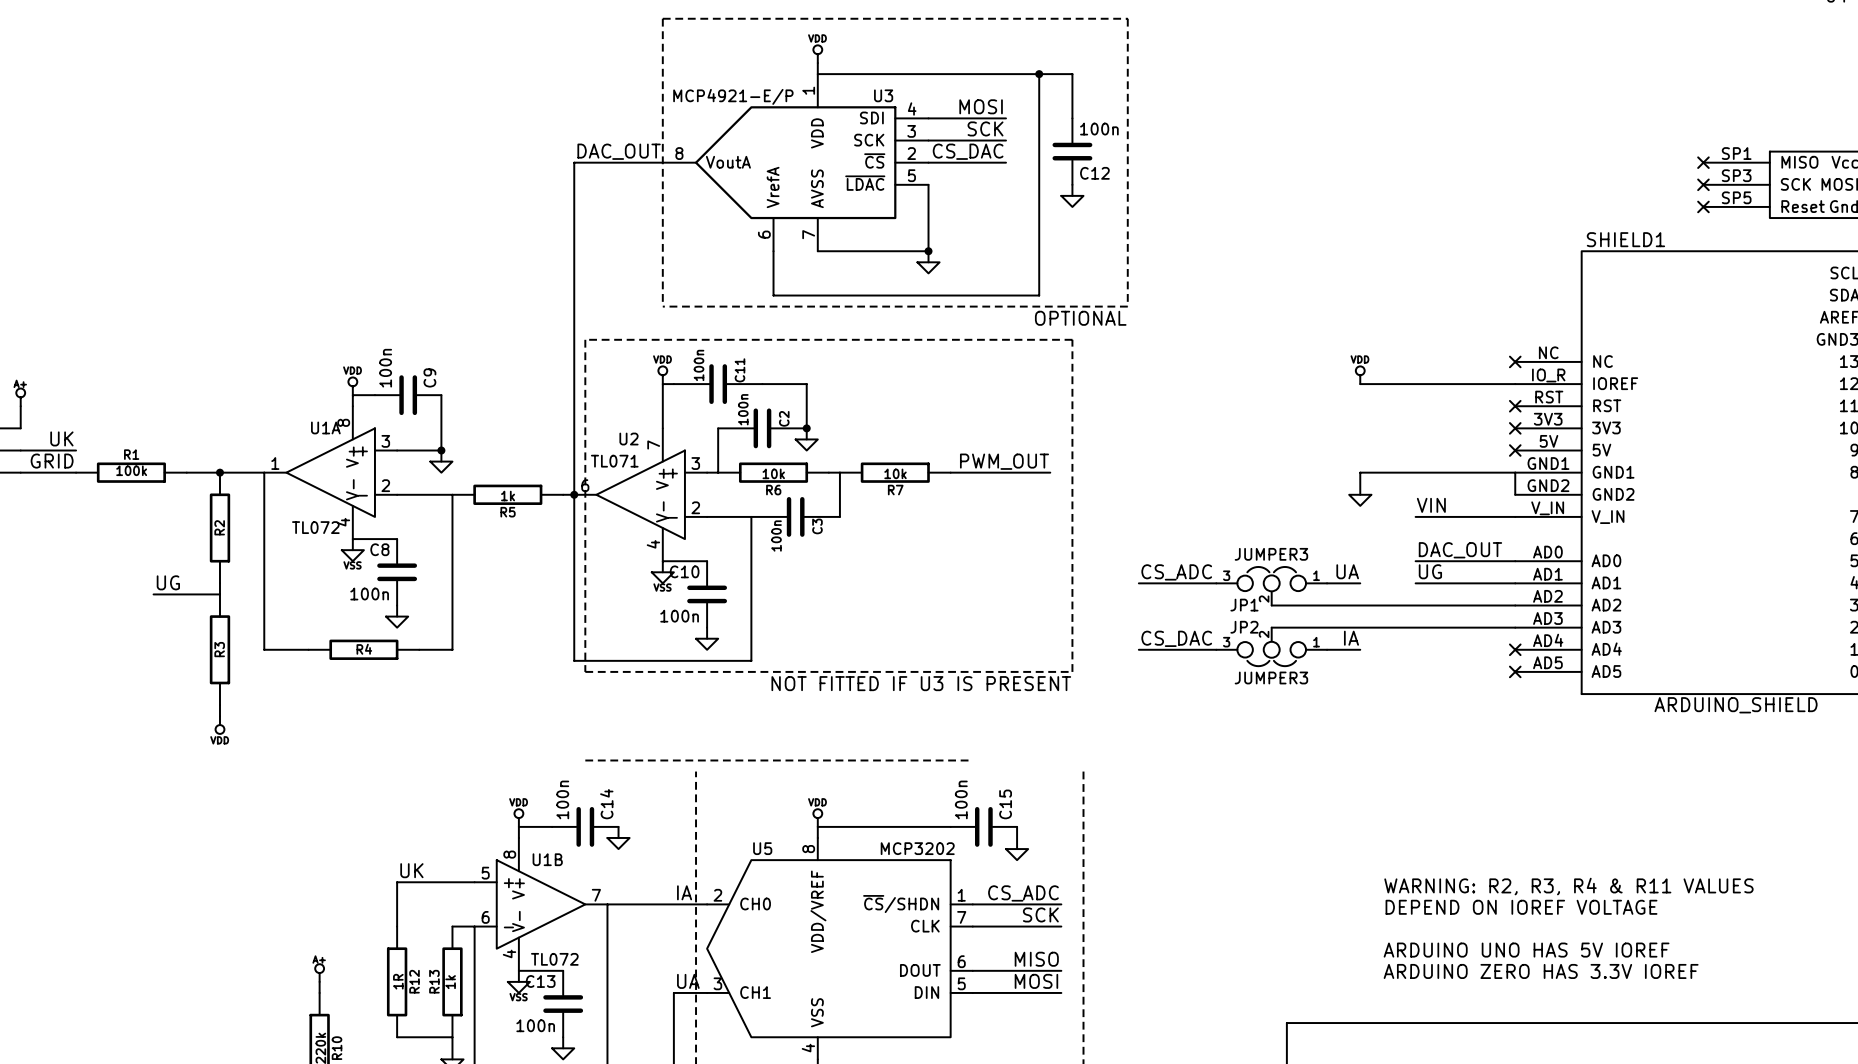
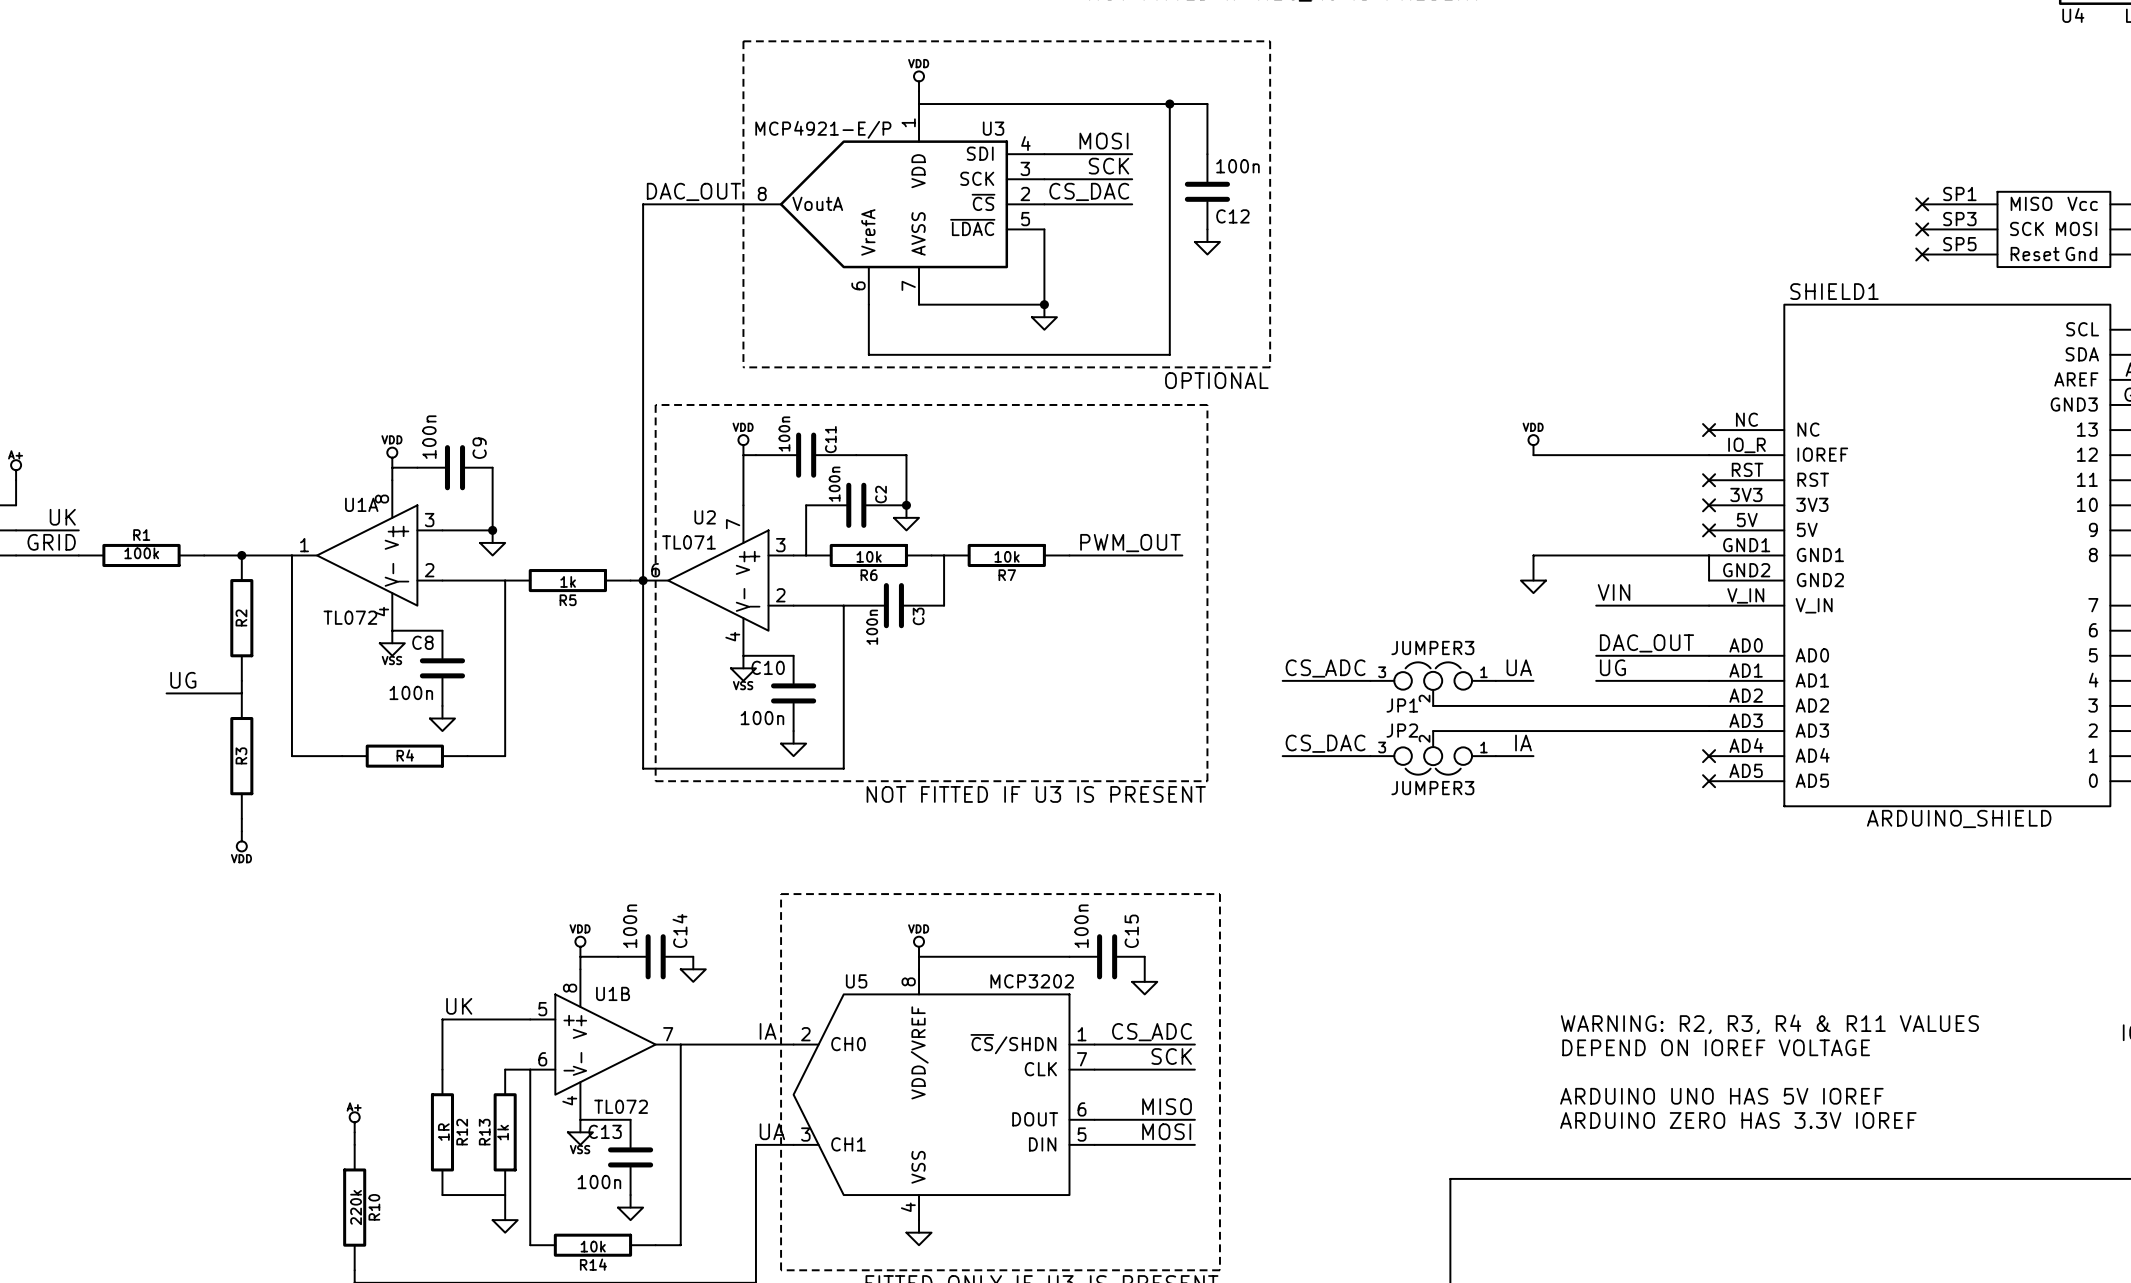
line: (585, 760) (972, 760) -> (781, 894) (1219, 894)

